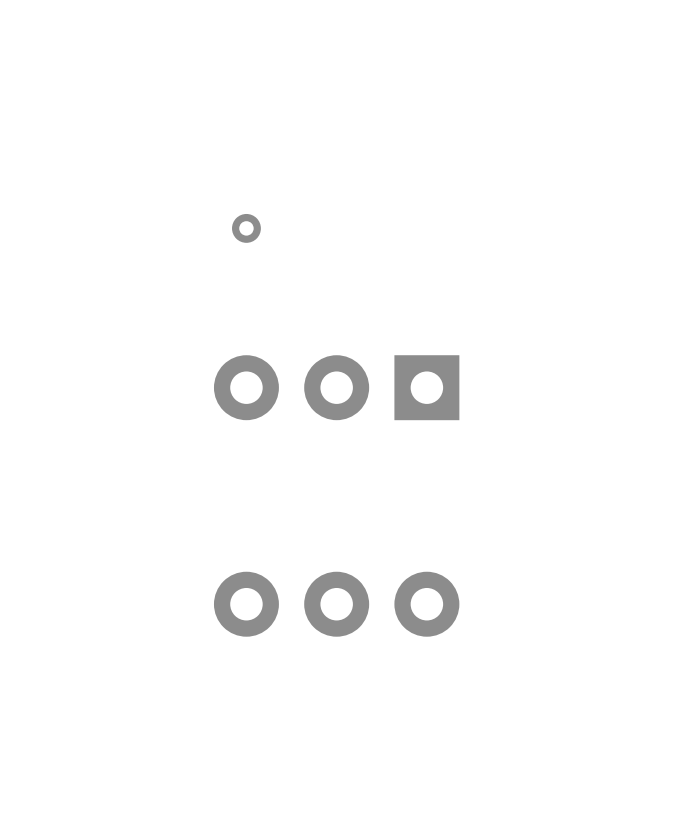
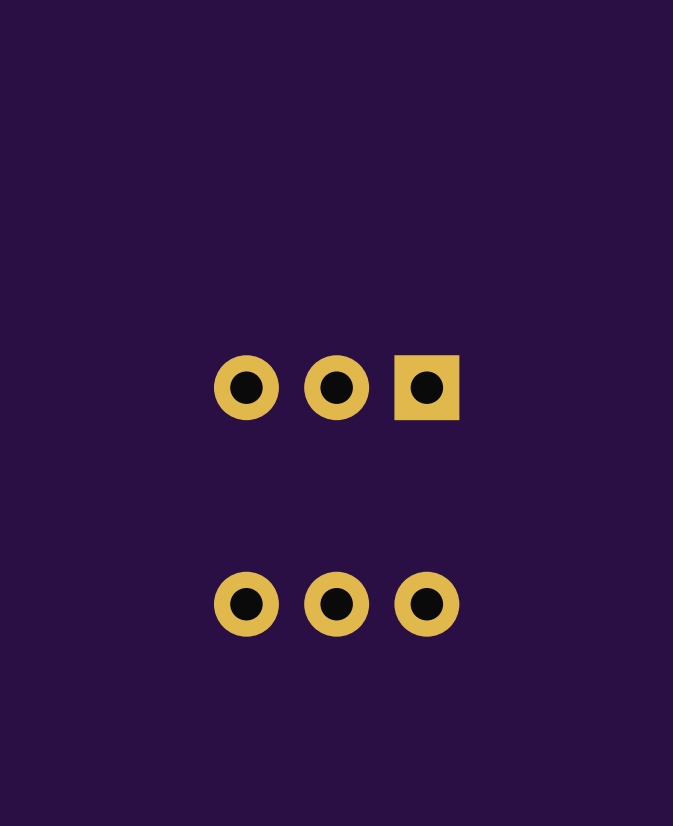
via: (246, 228) -> none

